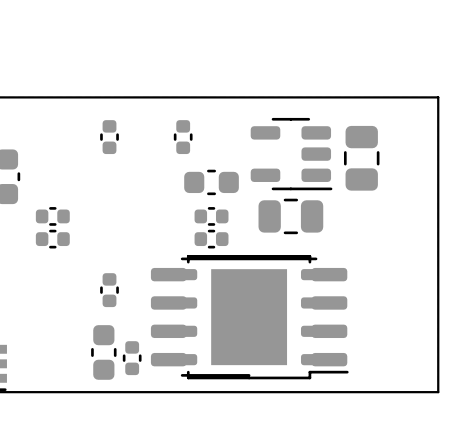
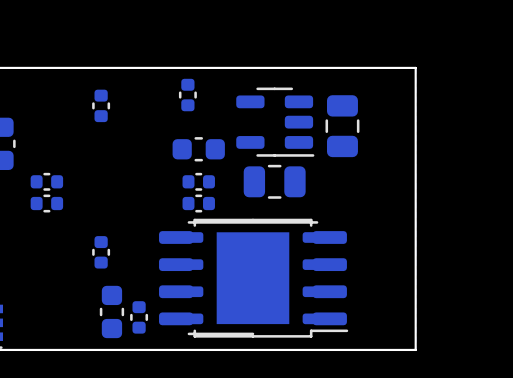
part position: (183, 137) -> (187, 95)
part position: (249, 317) -> (253, 278)
part position: (249, 317) -> (252, 278)
part position: (103, 352) -> (111, 311)
part position: (132, 358) -> (139, 317)

